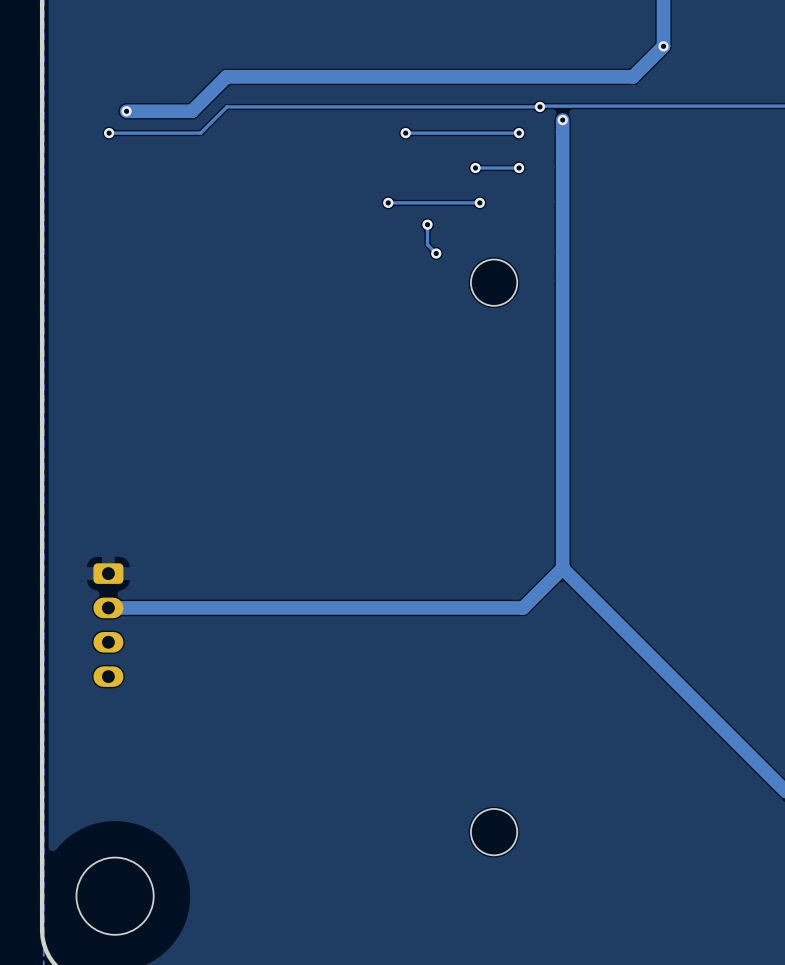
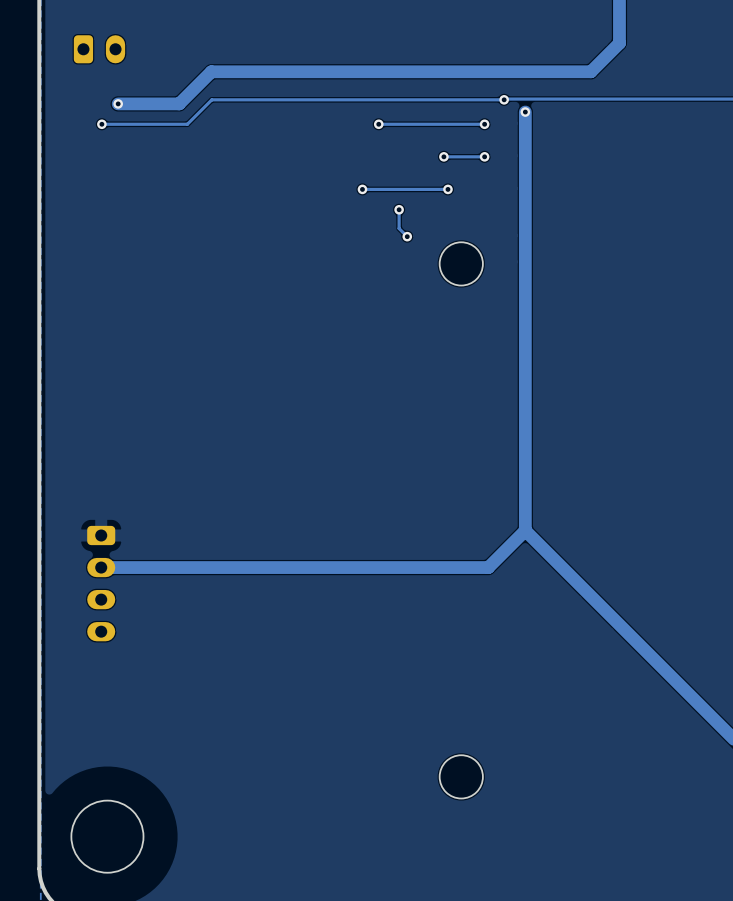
via: (663, 46) -> none
part: none -> (99, 49)

